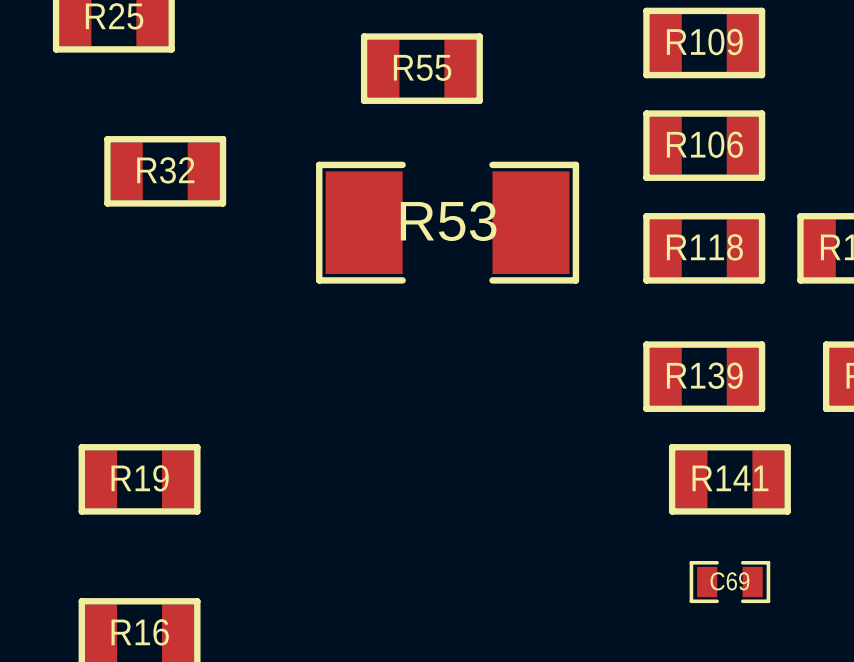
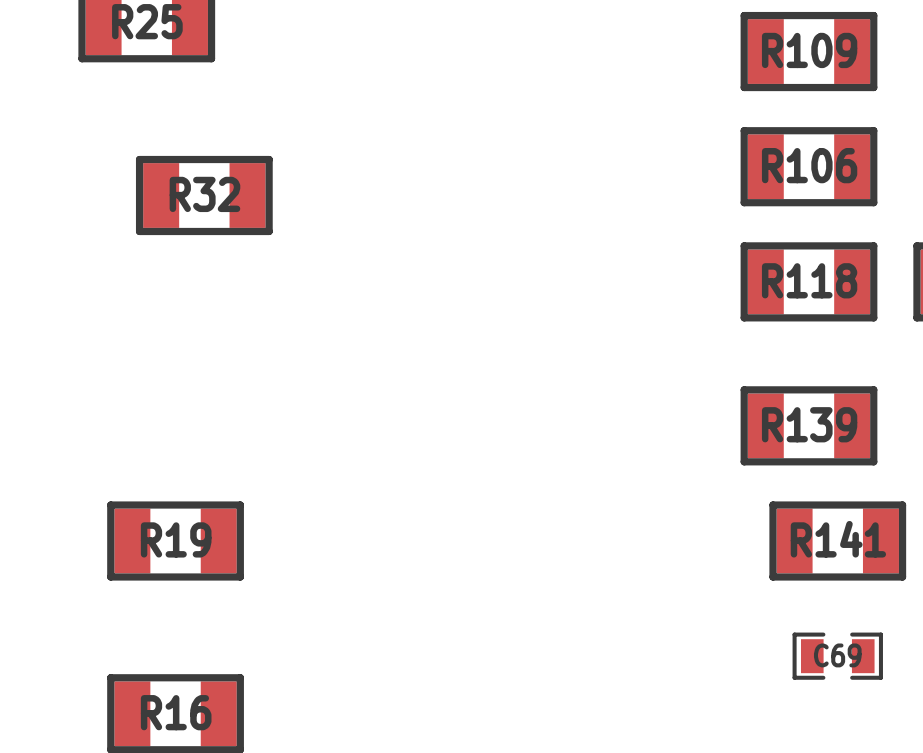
R55: (421, 68) -> none
R53: (447, 222) -> none

